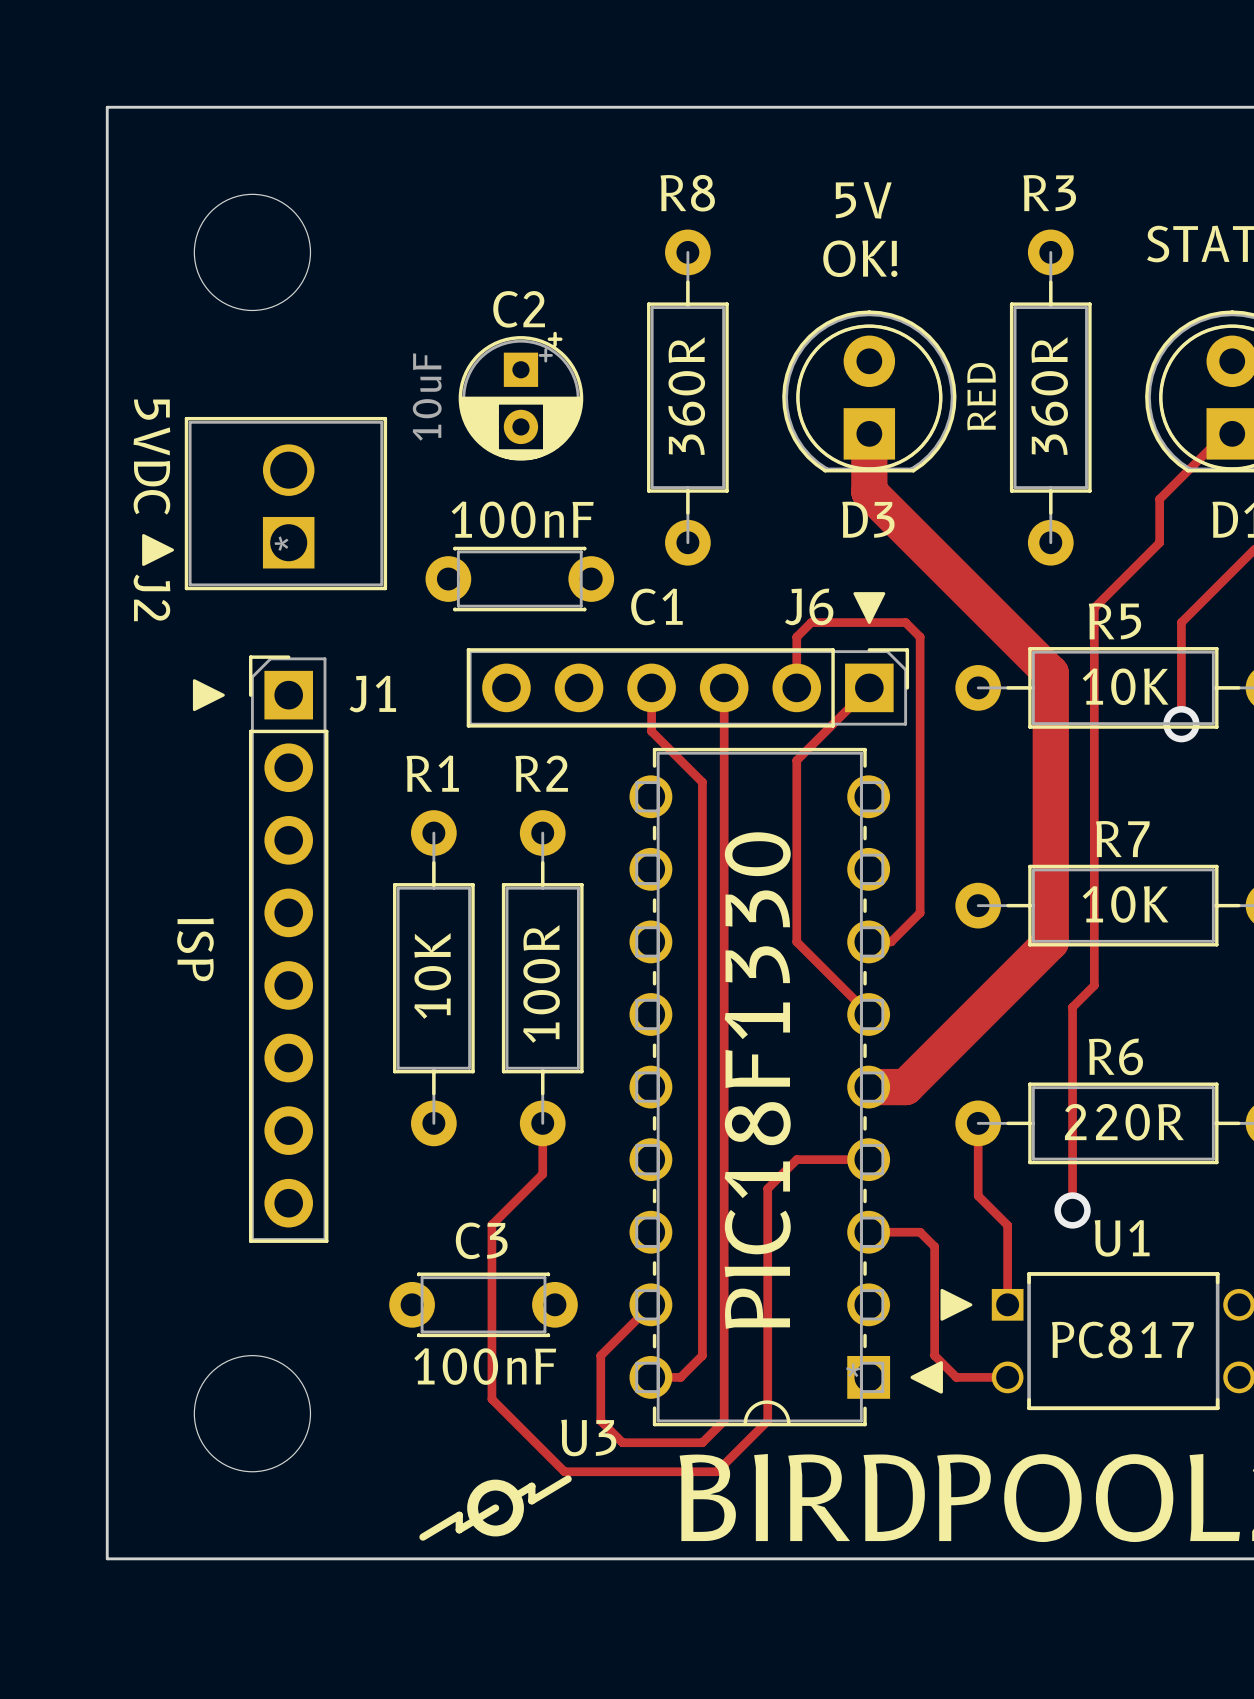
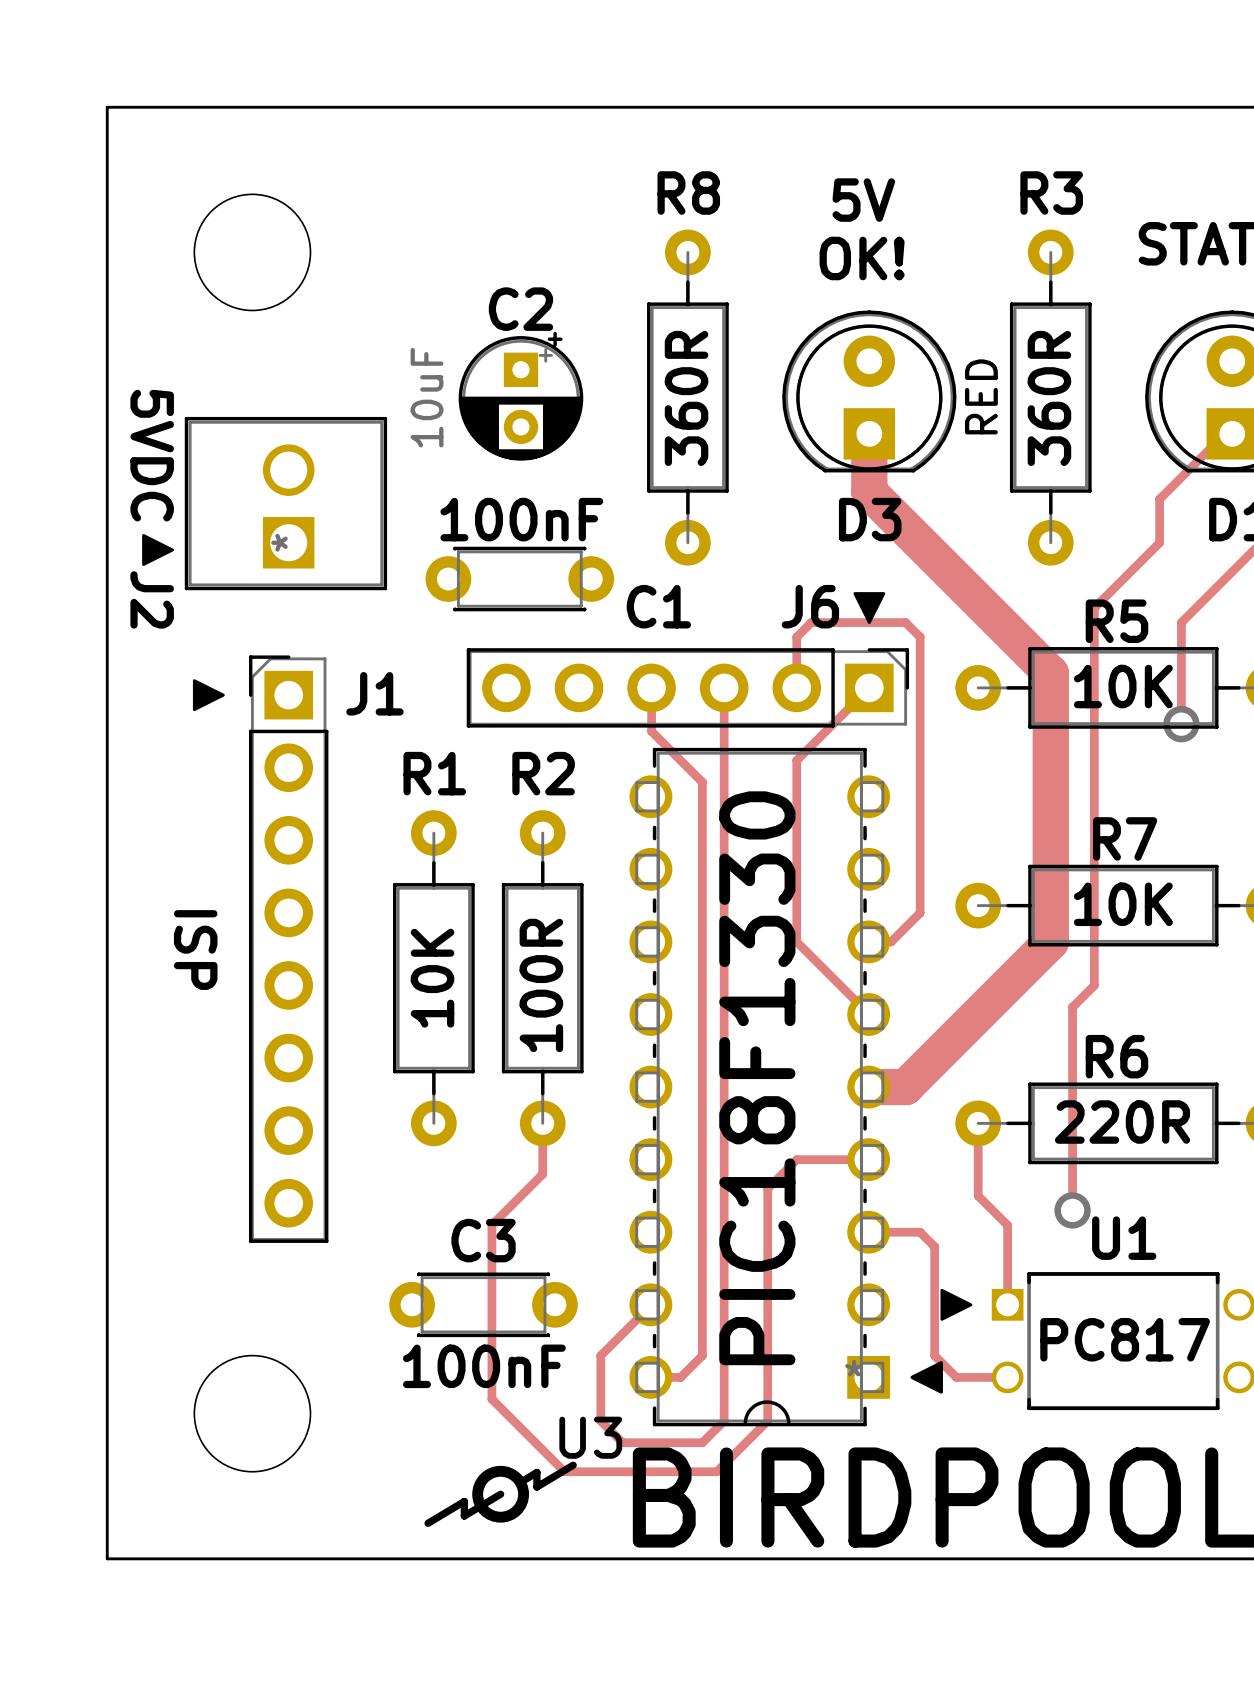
line: (568, 1479) (531, 1500) (531, 1486) (515, 1496) -> (573, 1465) (536, 1486) (536, 1472) (520, 1482)
line: (495, 1508) (459, 1529) (459, 1515) (422, 1537) -> (500, 1494) (464, 1516) (464, 1501) (428, 1523)
drawing position: (495, 1508) -> (500, 1494)

